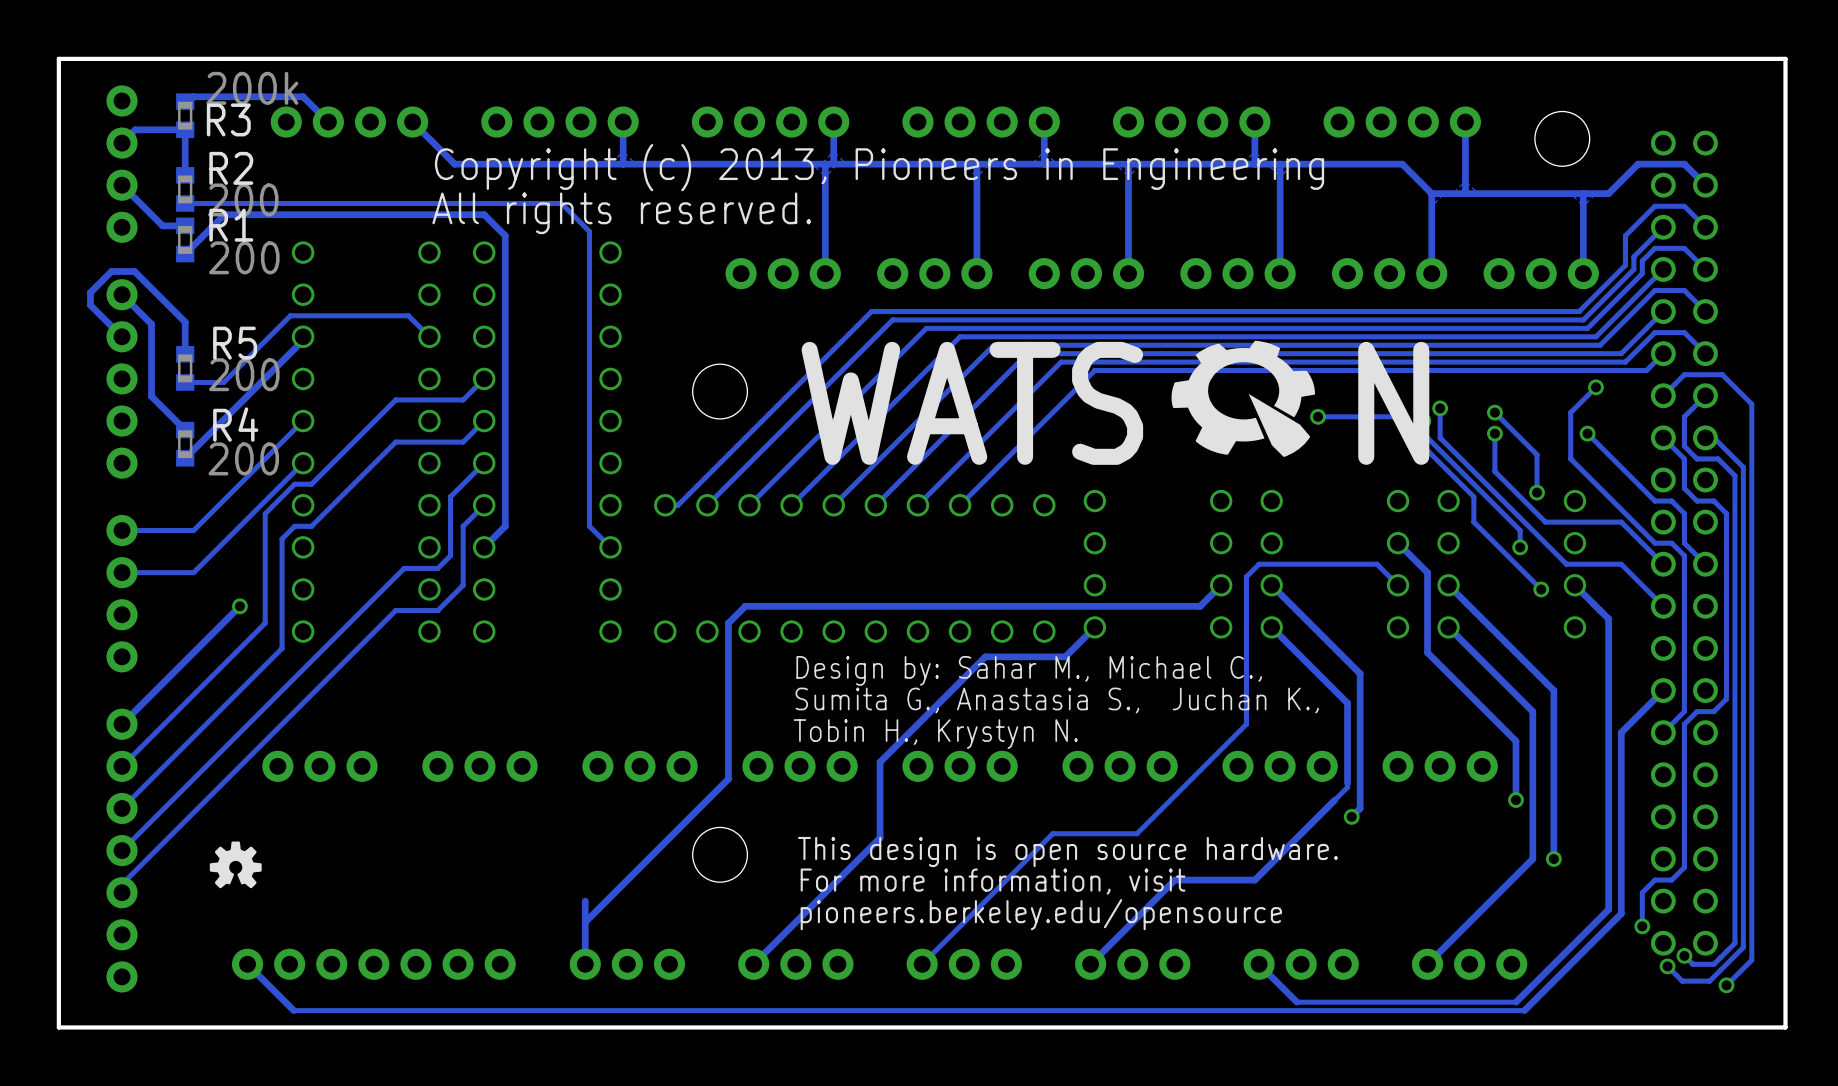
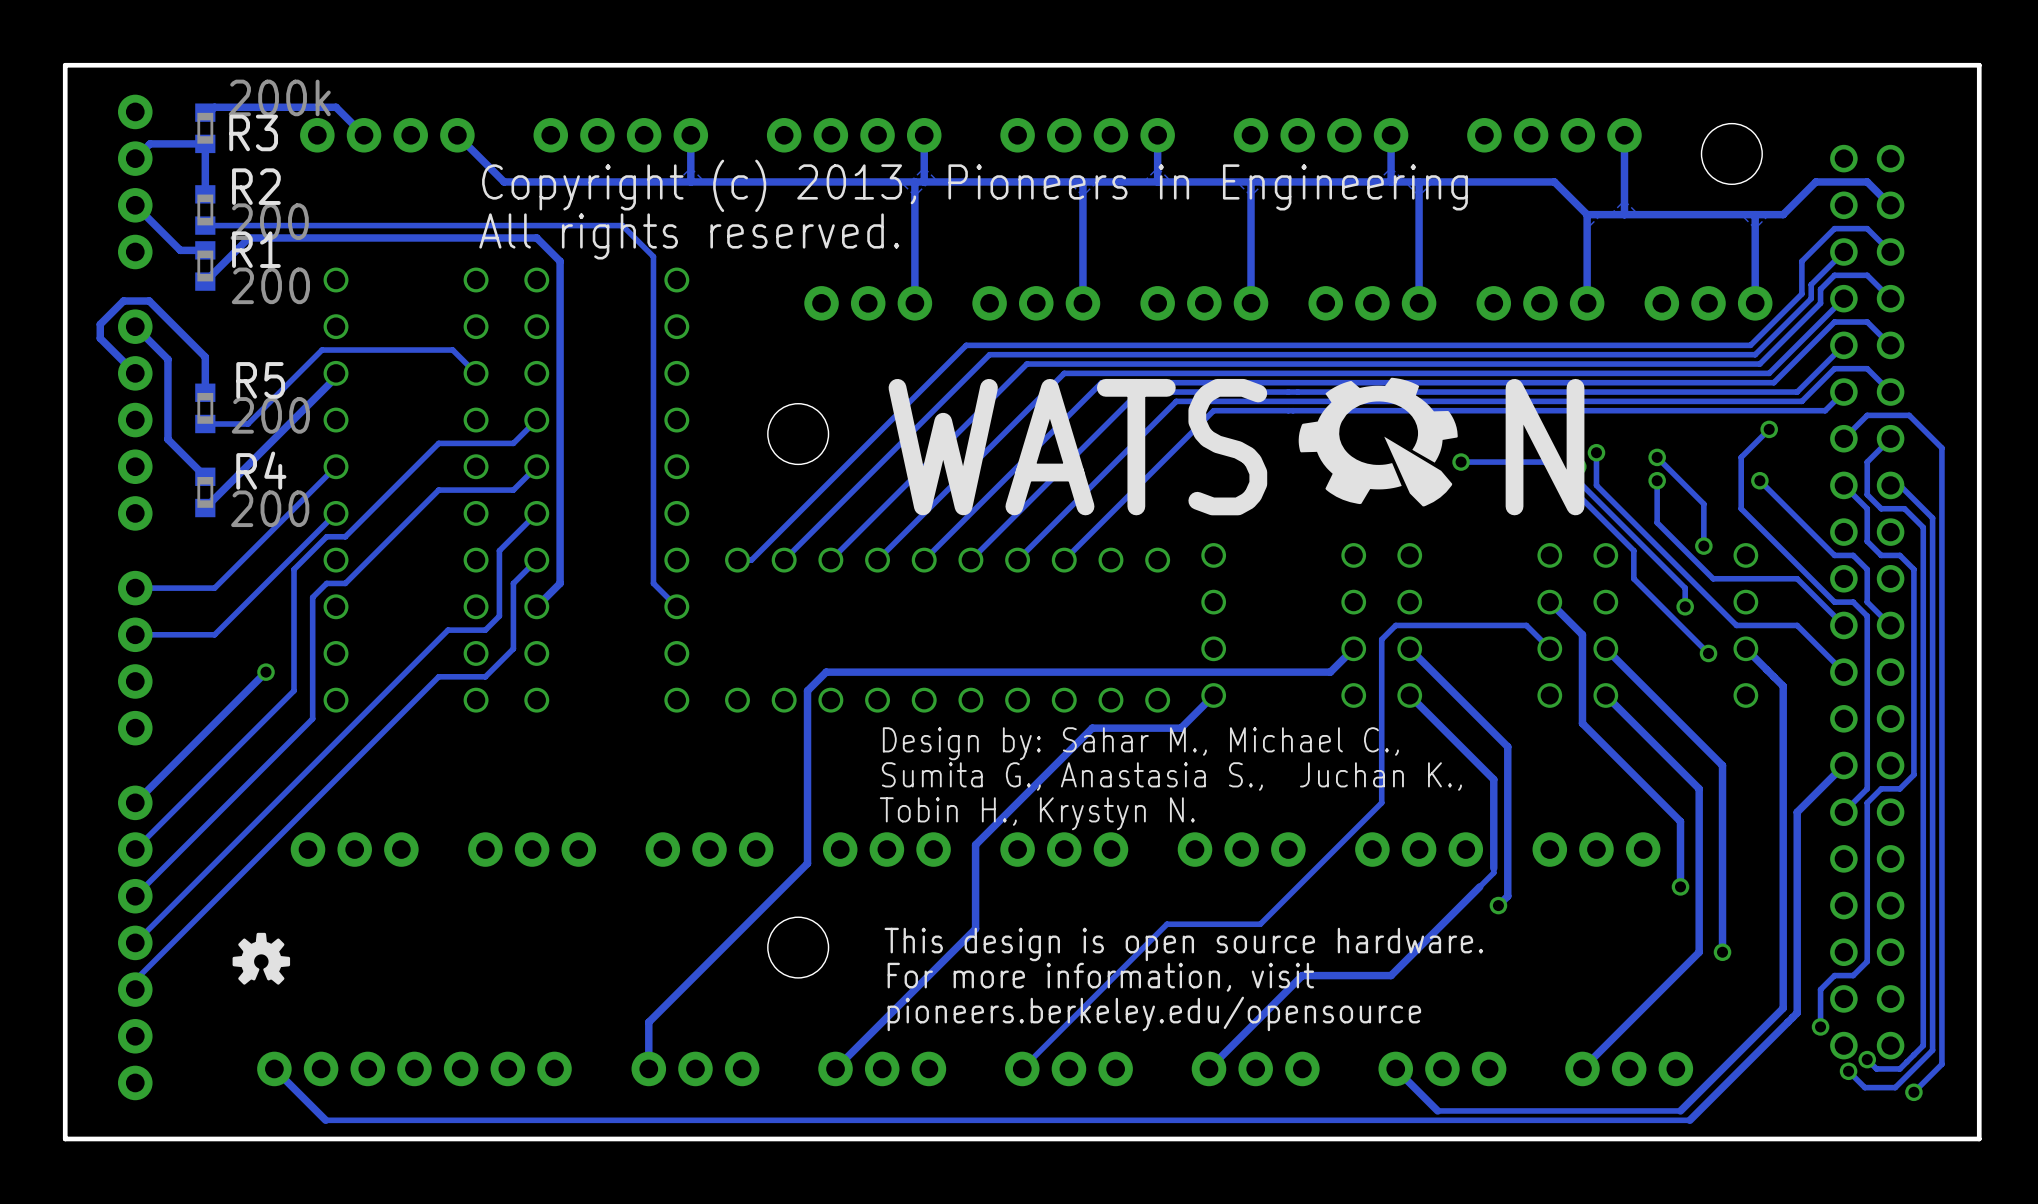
track: (585, 901) (585, 922) -> none

